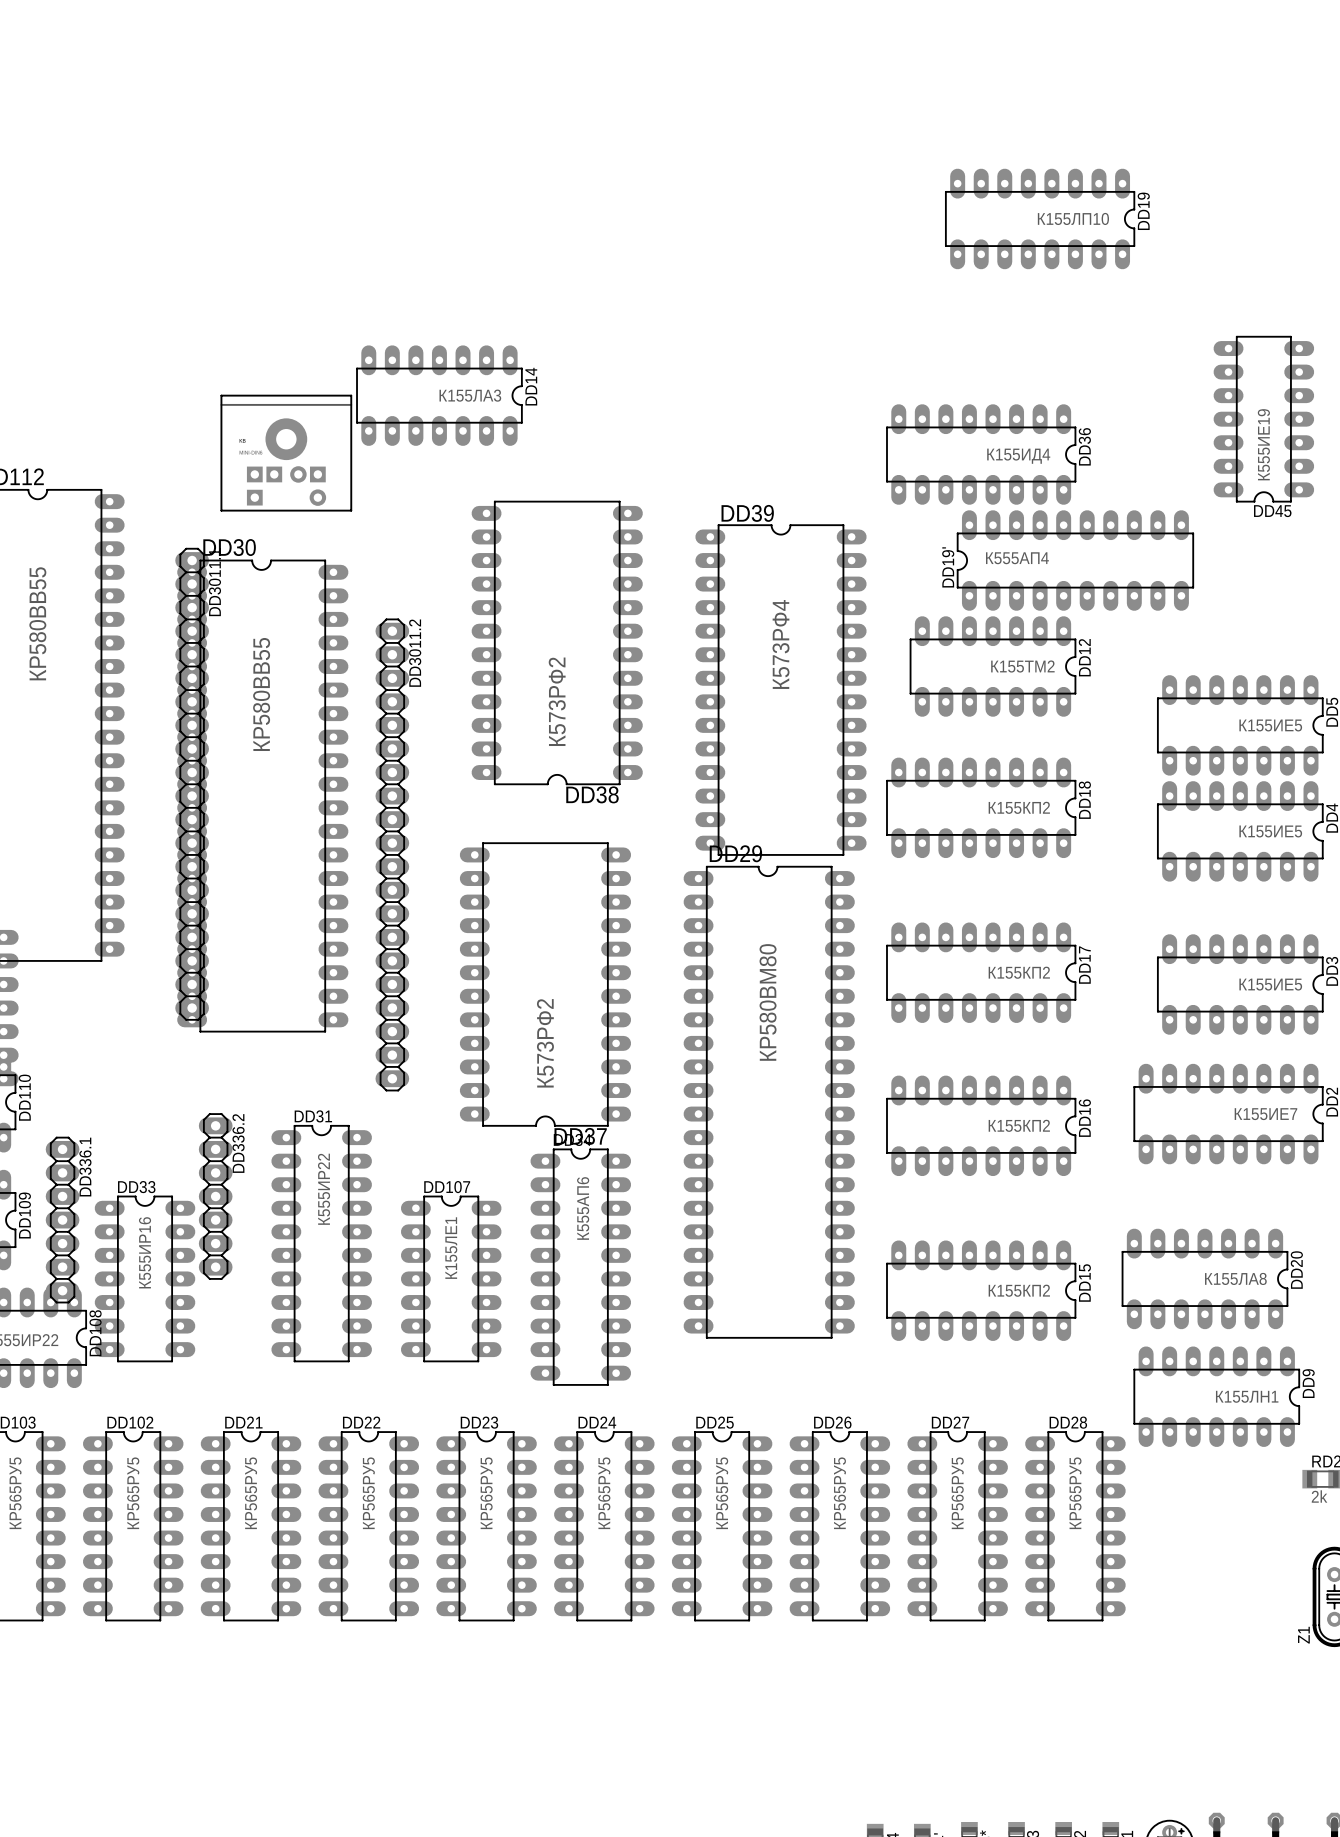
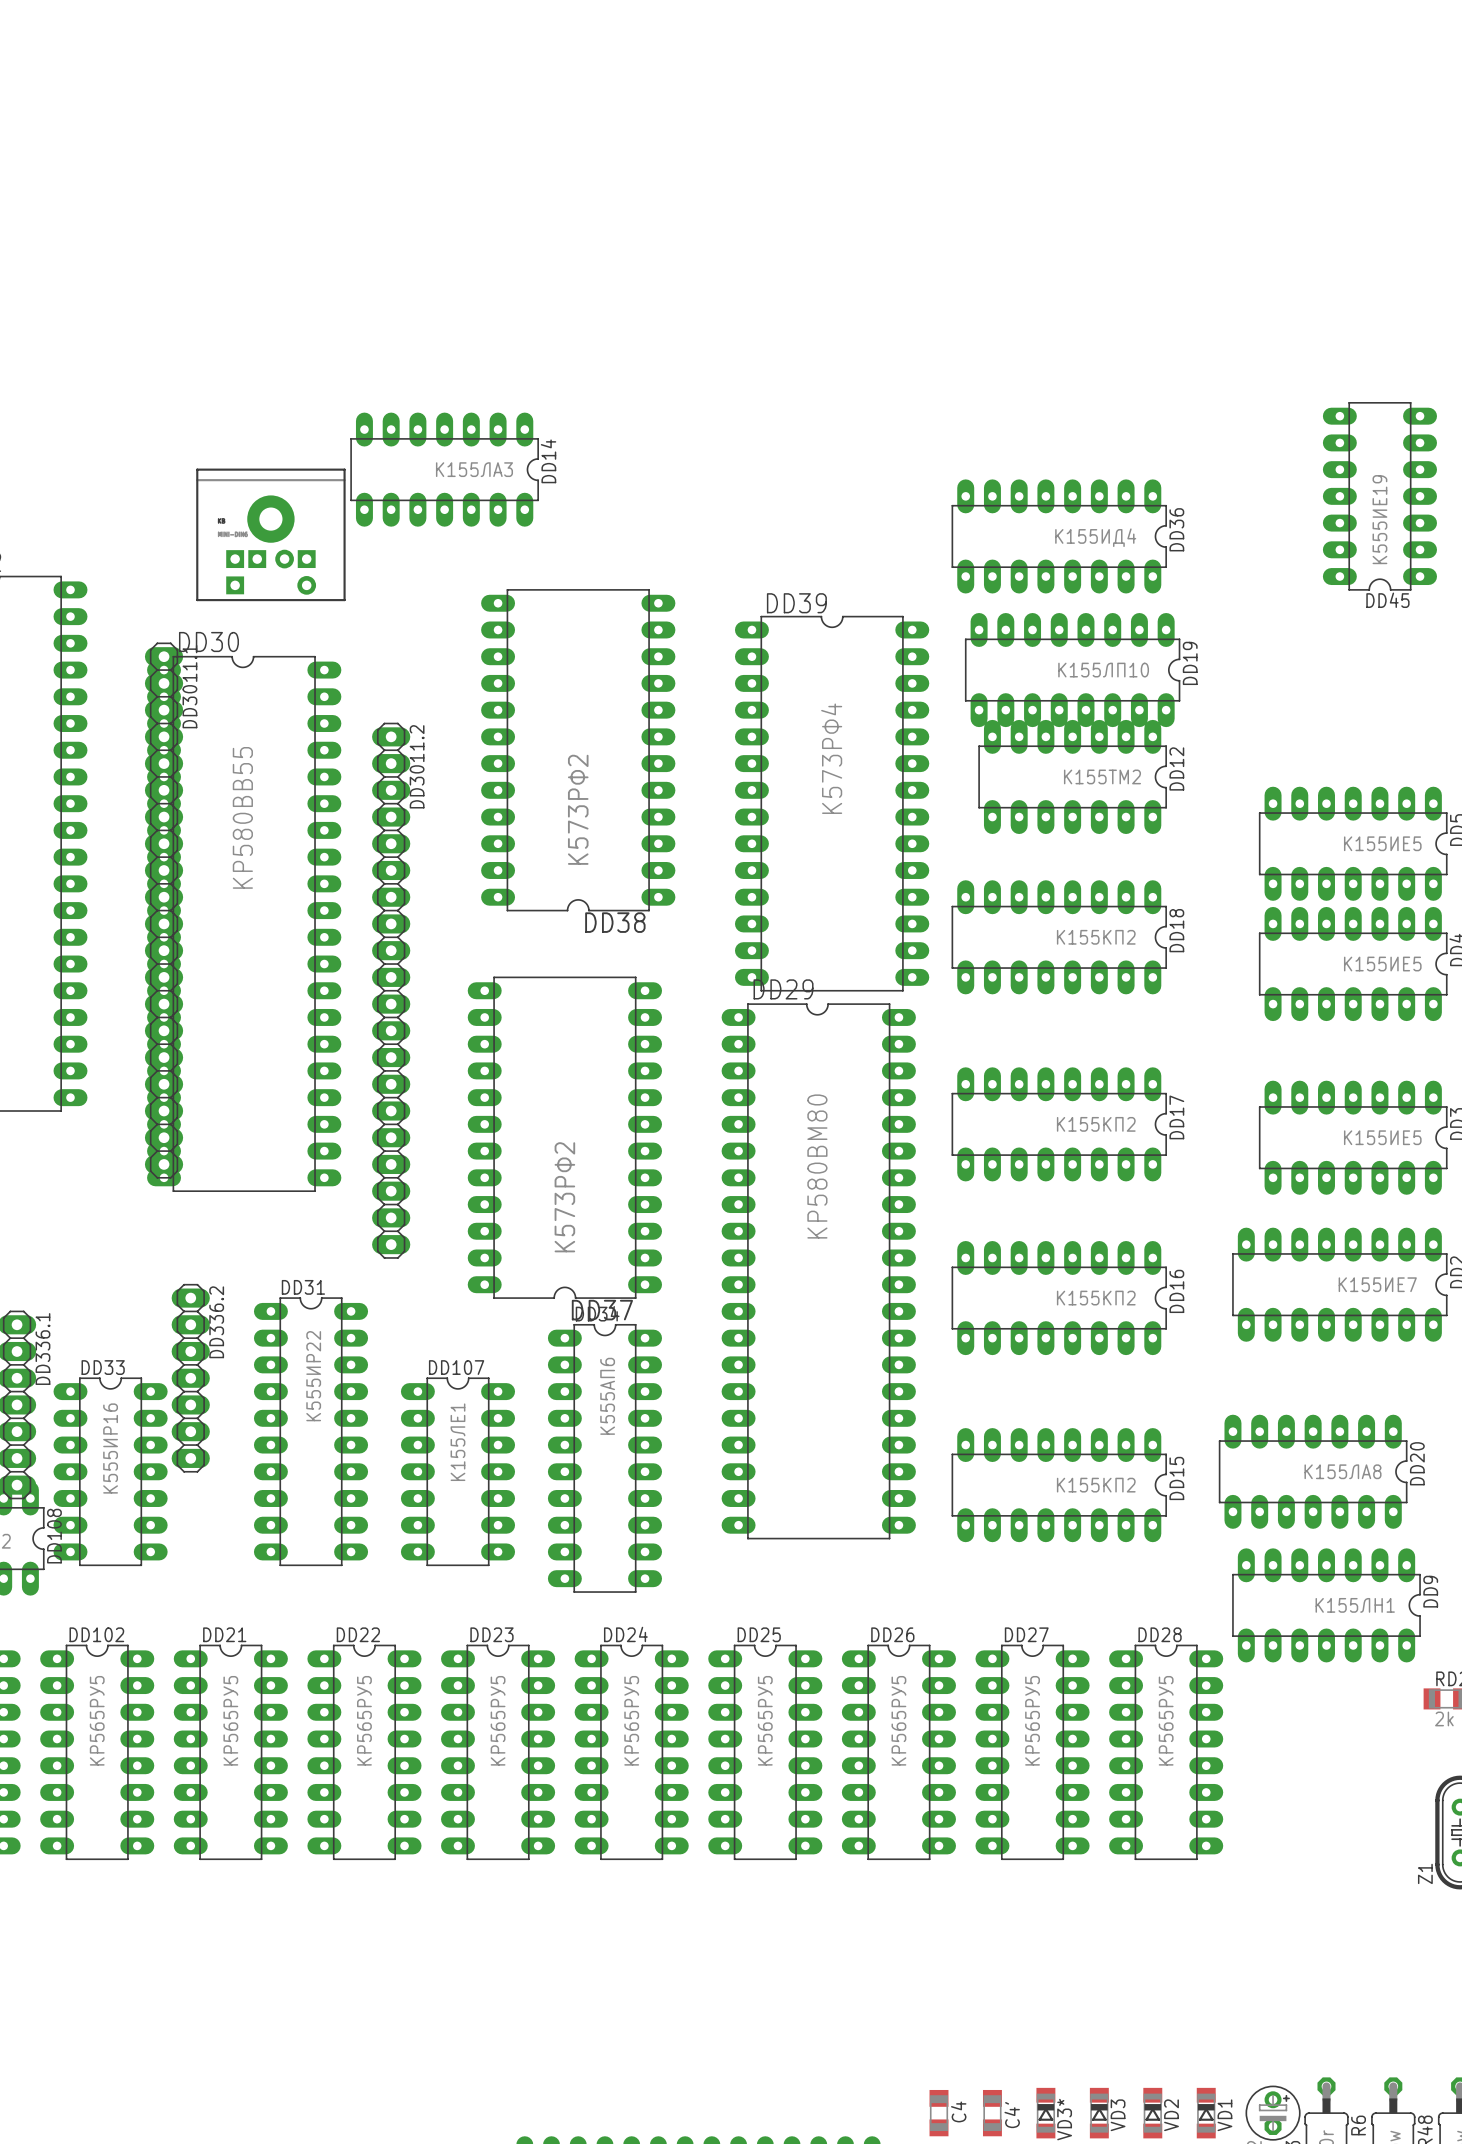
DD19 position: (1040, 218) -> (1072, 670)
DD19': К555АП4 (1075, 560) -> none

